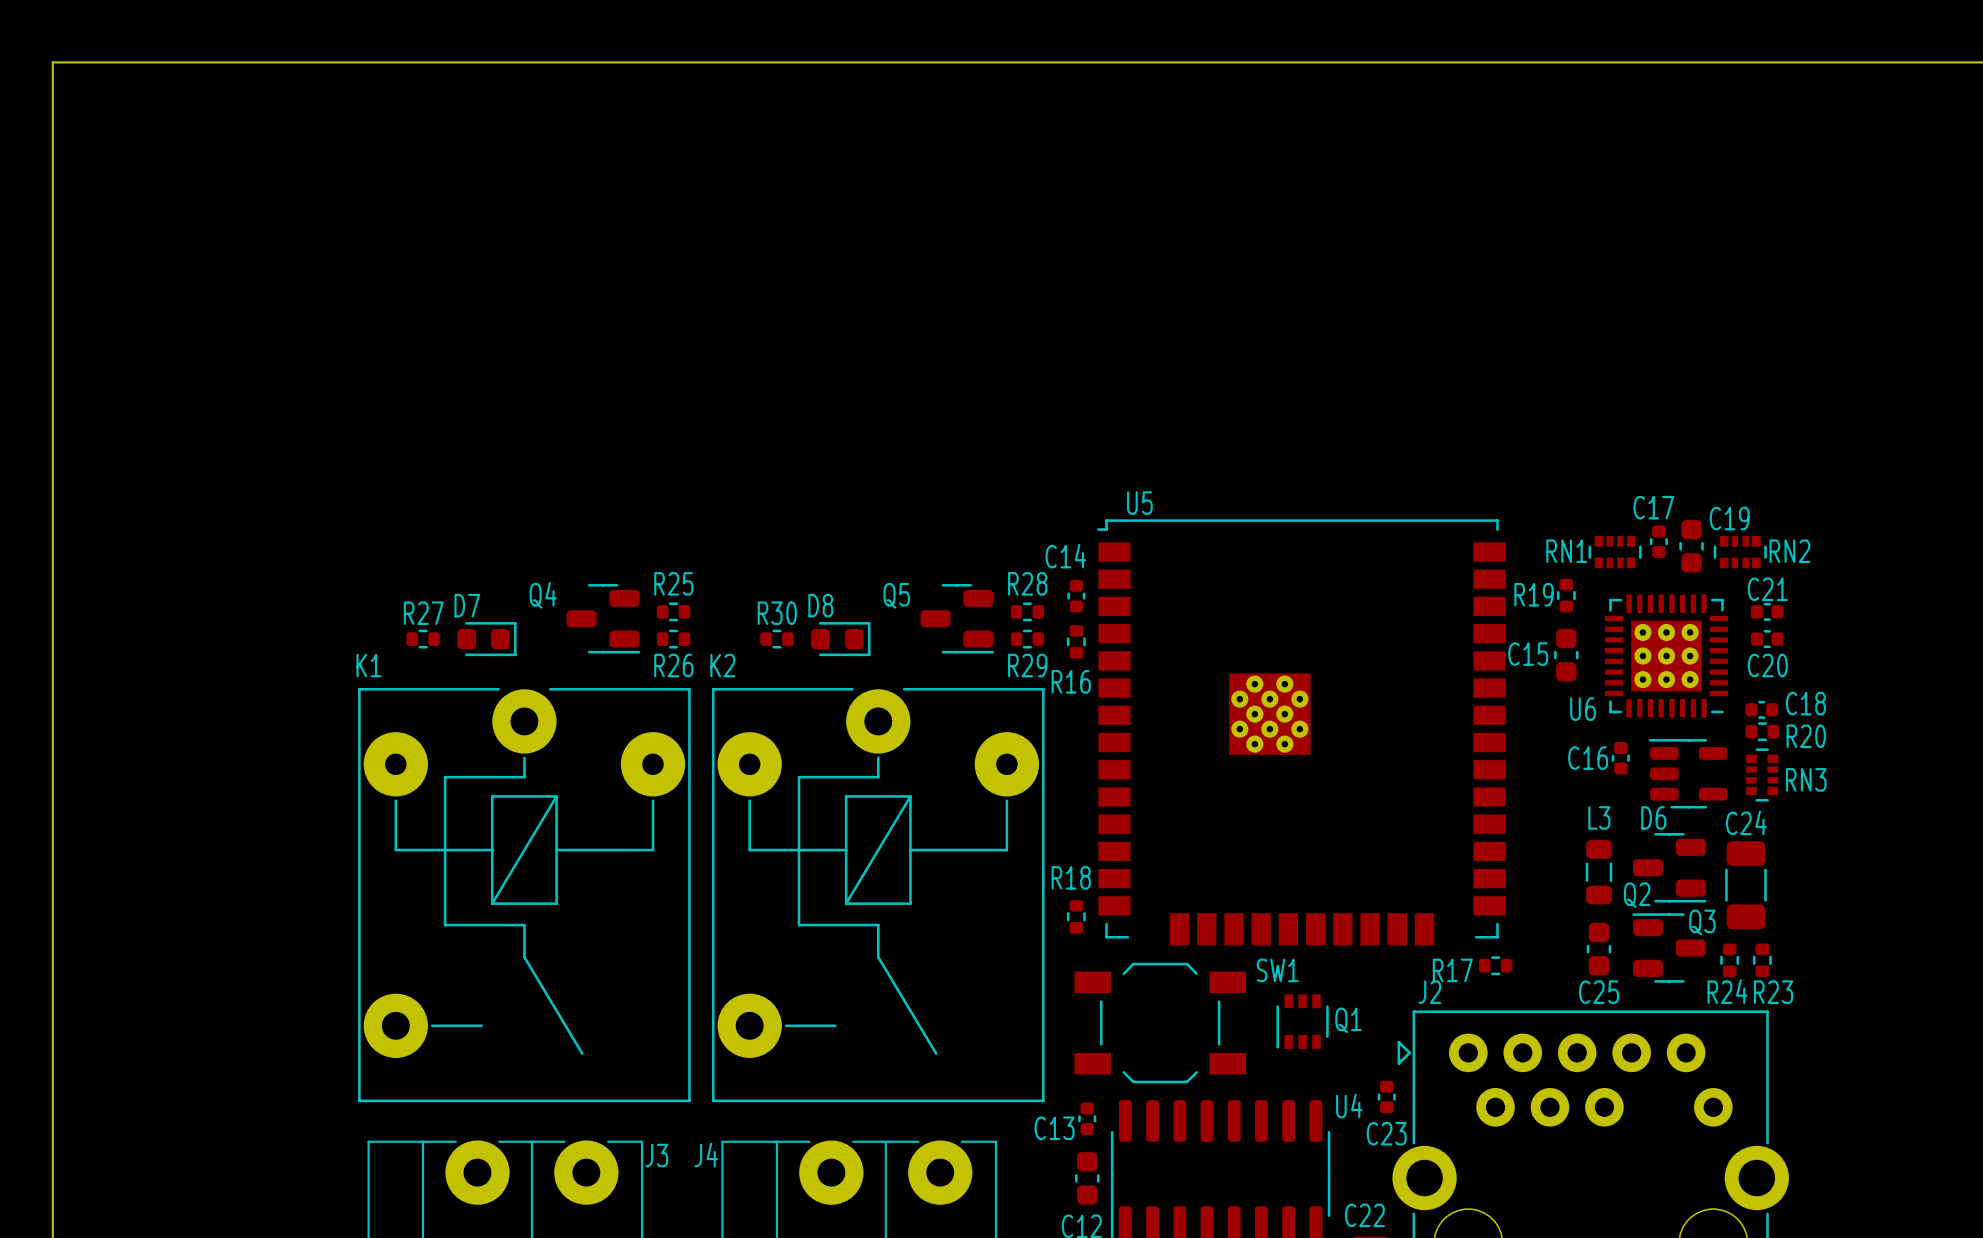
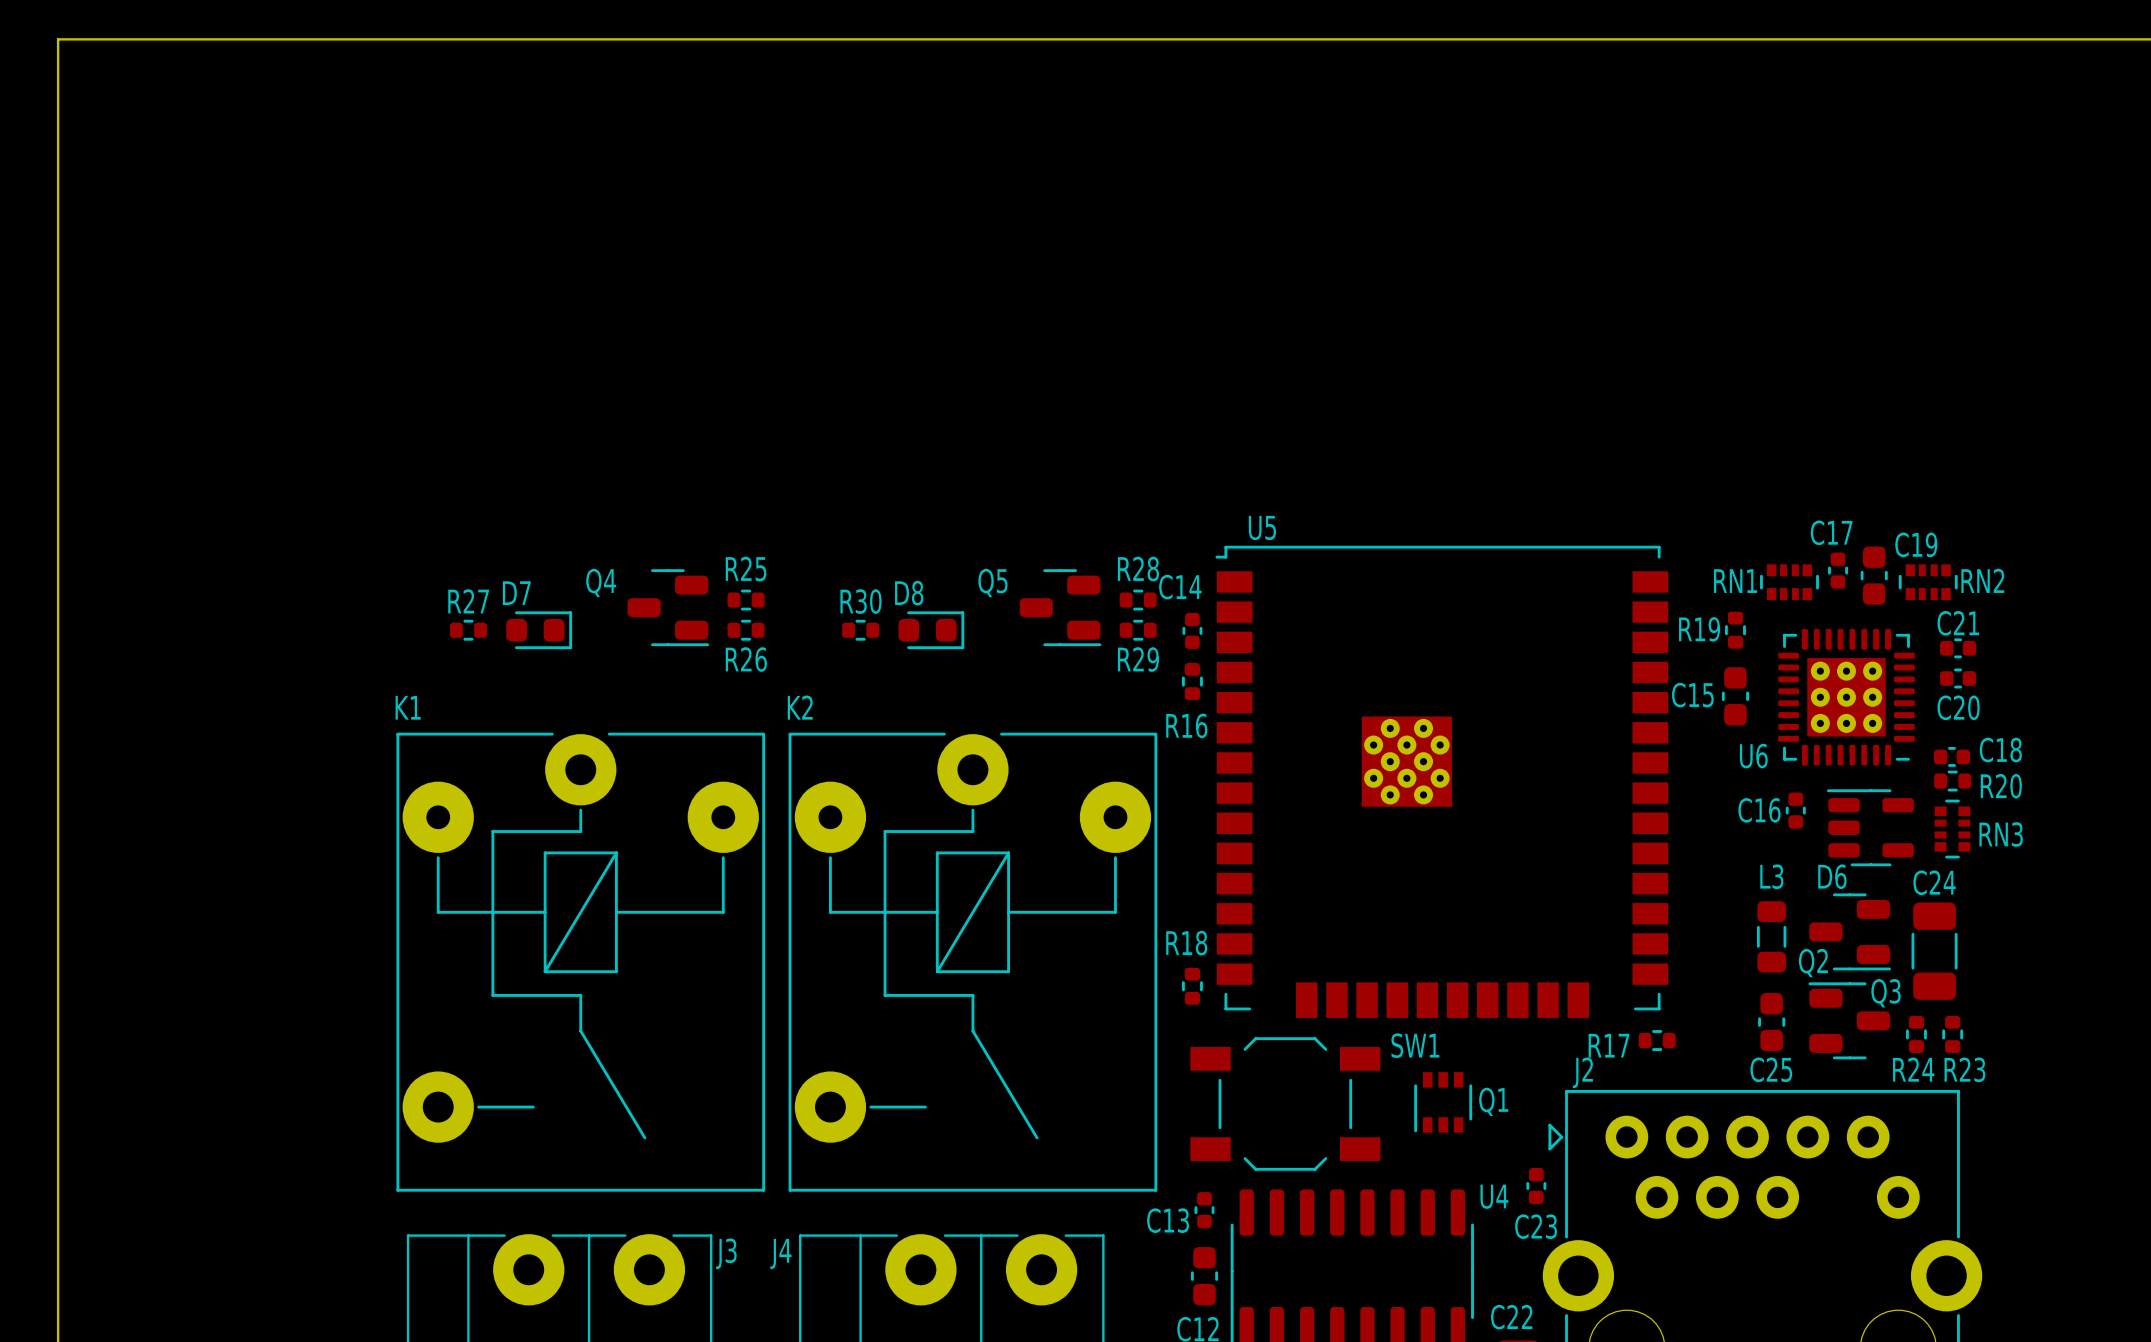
R25 position: (673, 611) -> (746, 600)
R28 position: (1027, 611) -> (1138, 600)
Q4 position: (603, 618) -> (668, 607)
Q5 position: (957, 618) -> (1060, 607)
R27 position: (423, 639) -> (468, 630)
D7 position: (486, 639) -> (539, 630)
R26 position: (673, 639) -> (746, 630)
R30 position: (776, 639) -> (860, 630)
D8 position: (840, 639) -> (931, 630)
R29 position: (1027, 639) -> (1138, 630)

